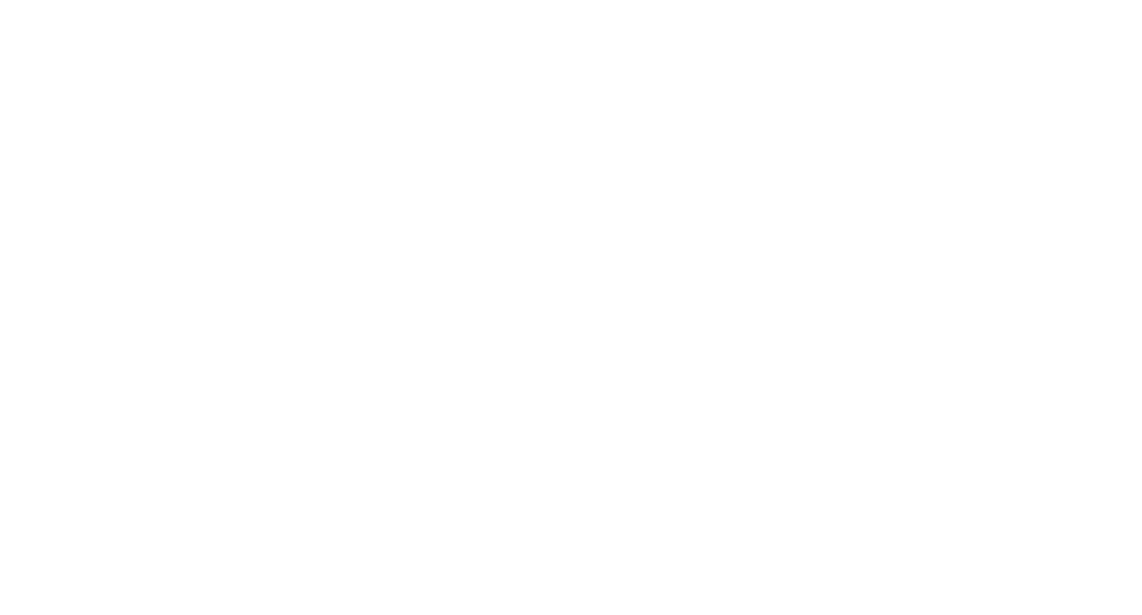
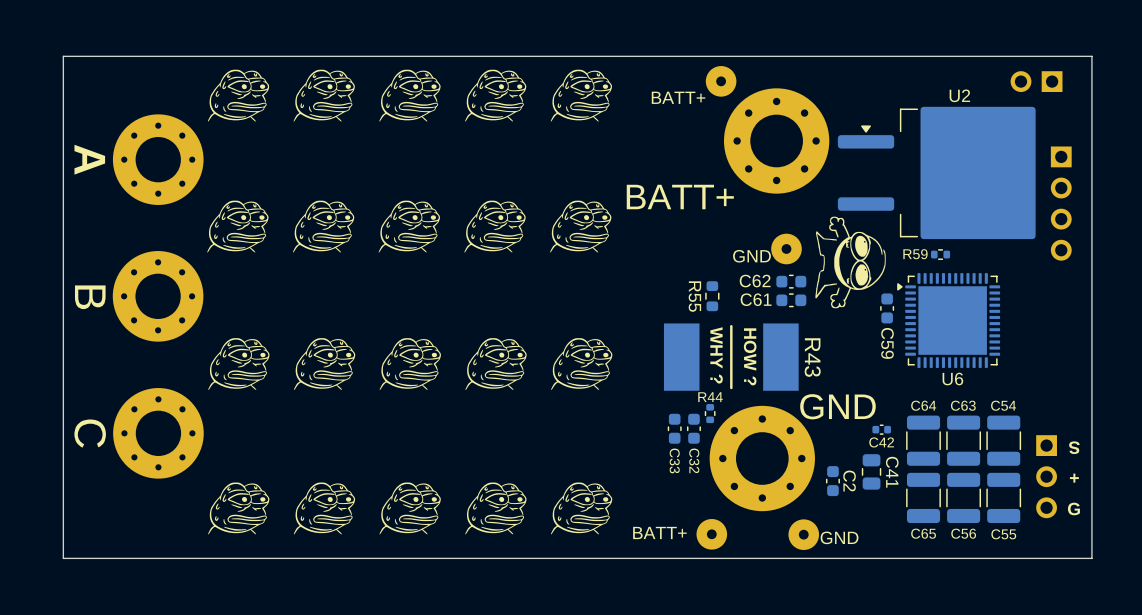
board edge: none -> (1091, 56) (63, 56) (63, 558) (1091, 558) (1091, 56)
drawing: none -> [207, 69, 270, 122]
drawing: none -> [293, 69, 355, 122]
drawing: none -> [379, 69, 441, 122]
drawing: none -> [465, 69, 527, 122]
drawing: none -> [550, 69, 613, 122]
part: none -> (721, 81)
part: none -> (1036, 81)
text: none -> BATT+ (678, 97)
part: none -> (776, 140)
text: none -> A (89, 159)
part: none -> (158, 159)
U2: none -> (936, 172)
text: none -> BATT+ (680, 197)
drawing: none -> [207, 200, 269, 253]
drawing: none -> [292, 200, 355, 253]
drawing: none -> [378, 200, 440, 253]
drawing: none -> [464, 200, 526, 253]
drawing: none -> [550, 200, 612, 253]
part: none -> (1061, 203)
drawing: none -> [815, 216, 886, 309]
part: none -> (786, 248)
R59: none -> (940, 254)
text: none -> GND (751, 256)
C62: none -> (791, 281)
part: none -> (158, 296)
R55: none -> (712, 296)
text: none -> B (90, 297)
C61: none -> (791, 300)
C59: none -> (887, 308)
U6: none -> (948, 320)
drawing: none -> [208, 338, 270, 391]
drawing: none -> [293, 338, 356, 391]
drawing: none -> [379, 338, 441, 391]
drawing: none -> [465, 338, 527, 391]
drawing: none -> [551, 338, 613, 391]
text: none -> WHY ? (716, 355)
R43: none -> (731, 357)
text: none -> HOW ? (750, 356)
text: none -> GND (837, 406)
R44: none -> (710, 413)
C33: none -> (674, 428)
C32: none -> (693, 428)
C42: none -> (881, 429)
text: none -> C (90, 433)
part: none -> (158, 433)
C64: none -> (923, 440)
C63: none -> (963, 440)
C54: none -> (1003, 440)
text: none -> S (1074, 447)
part: none -> (762, 458)
C41: none -> (871, 471)
part: none -> (1046, 476)
text: none -> + (1074, 478)
C2: none -> (832, 481)
drawing: none -> [208, 482, 270, 535]
drawing: none -> [293, 482, 356, 535]
drawing: none -> [379, 482, 441, 535]
drawing: none -> [465, 482, 527, 535]
drawing: none -> [550, 482, 613, 535]
C65: none -> (923, 497)
C56: none -> (963, 497)
C55: none -> (1003, 497)
text: none -> G (1073, 508)
text: none -> BATT+ (659, 532)
part: none -> (711, 534)
part: none -> (803, 534)
text: none -> GND (839, 537)

